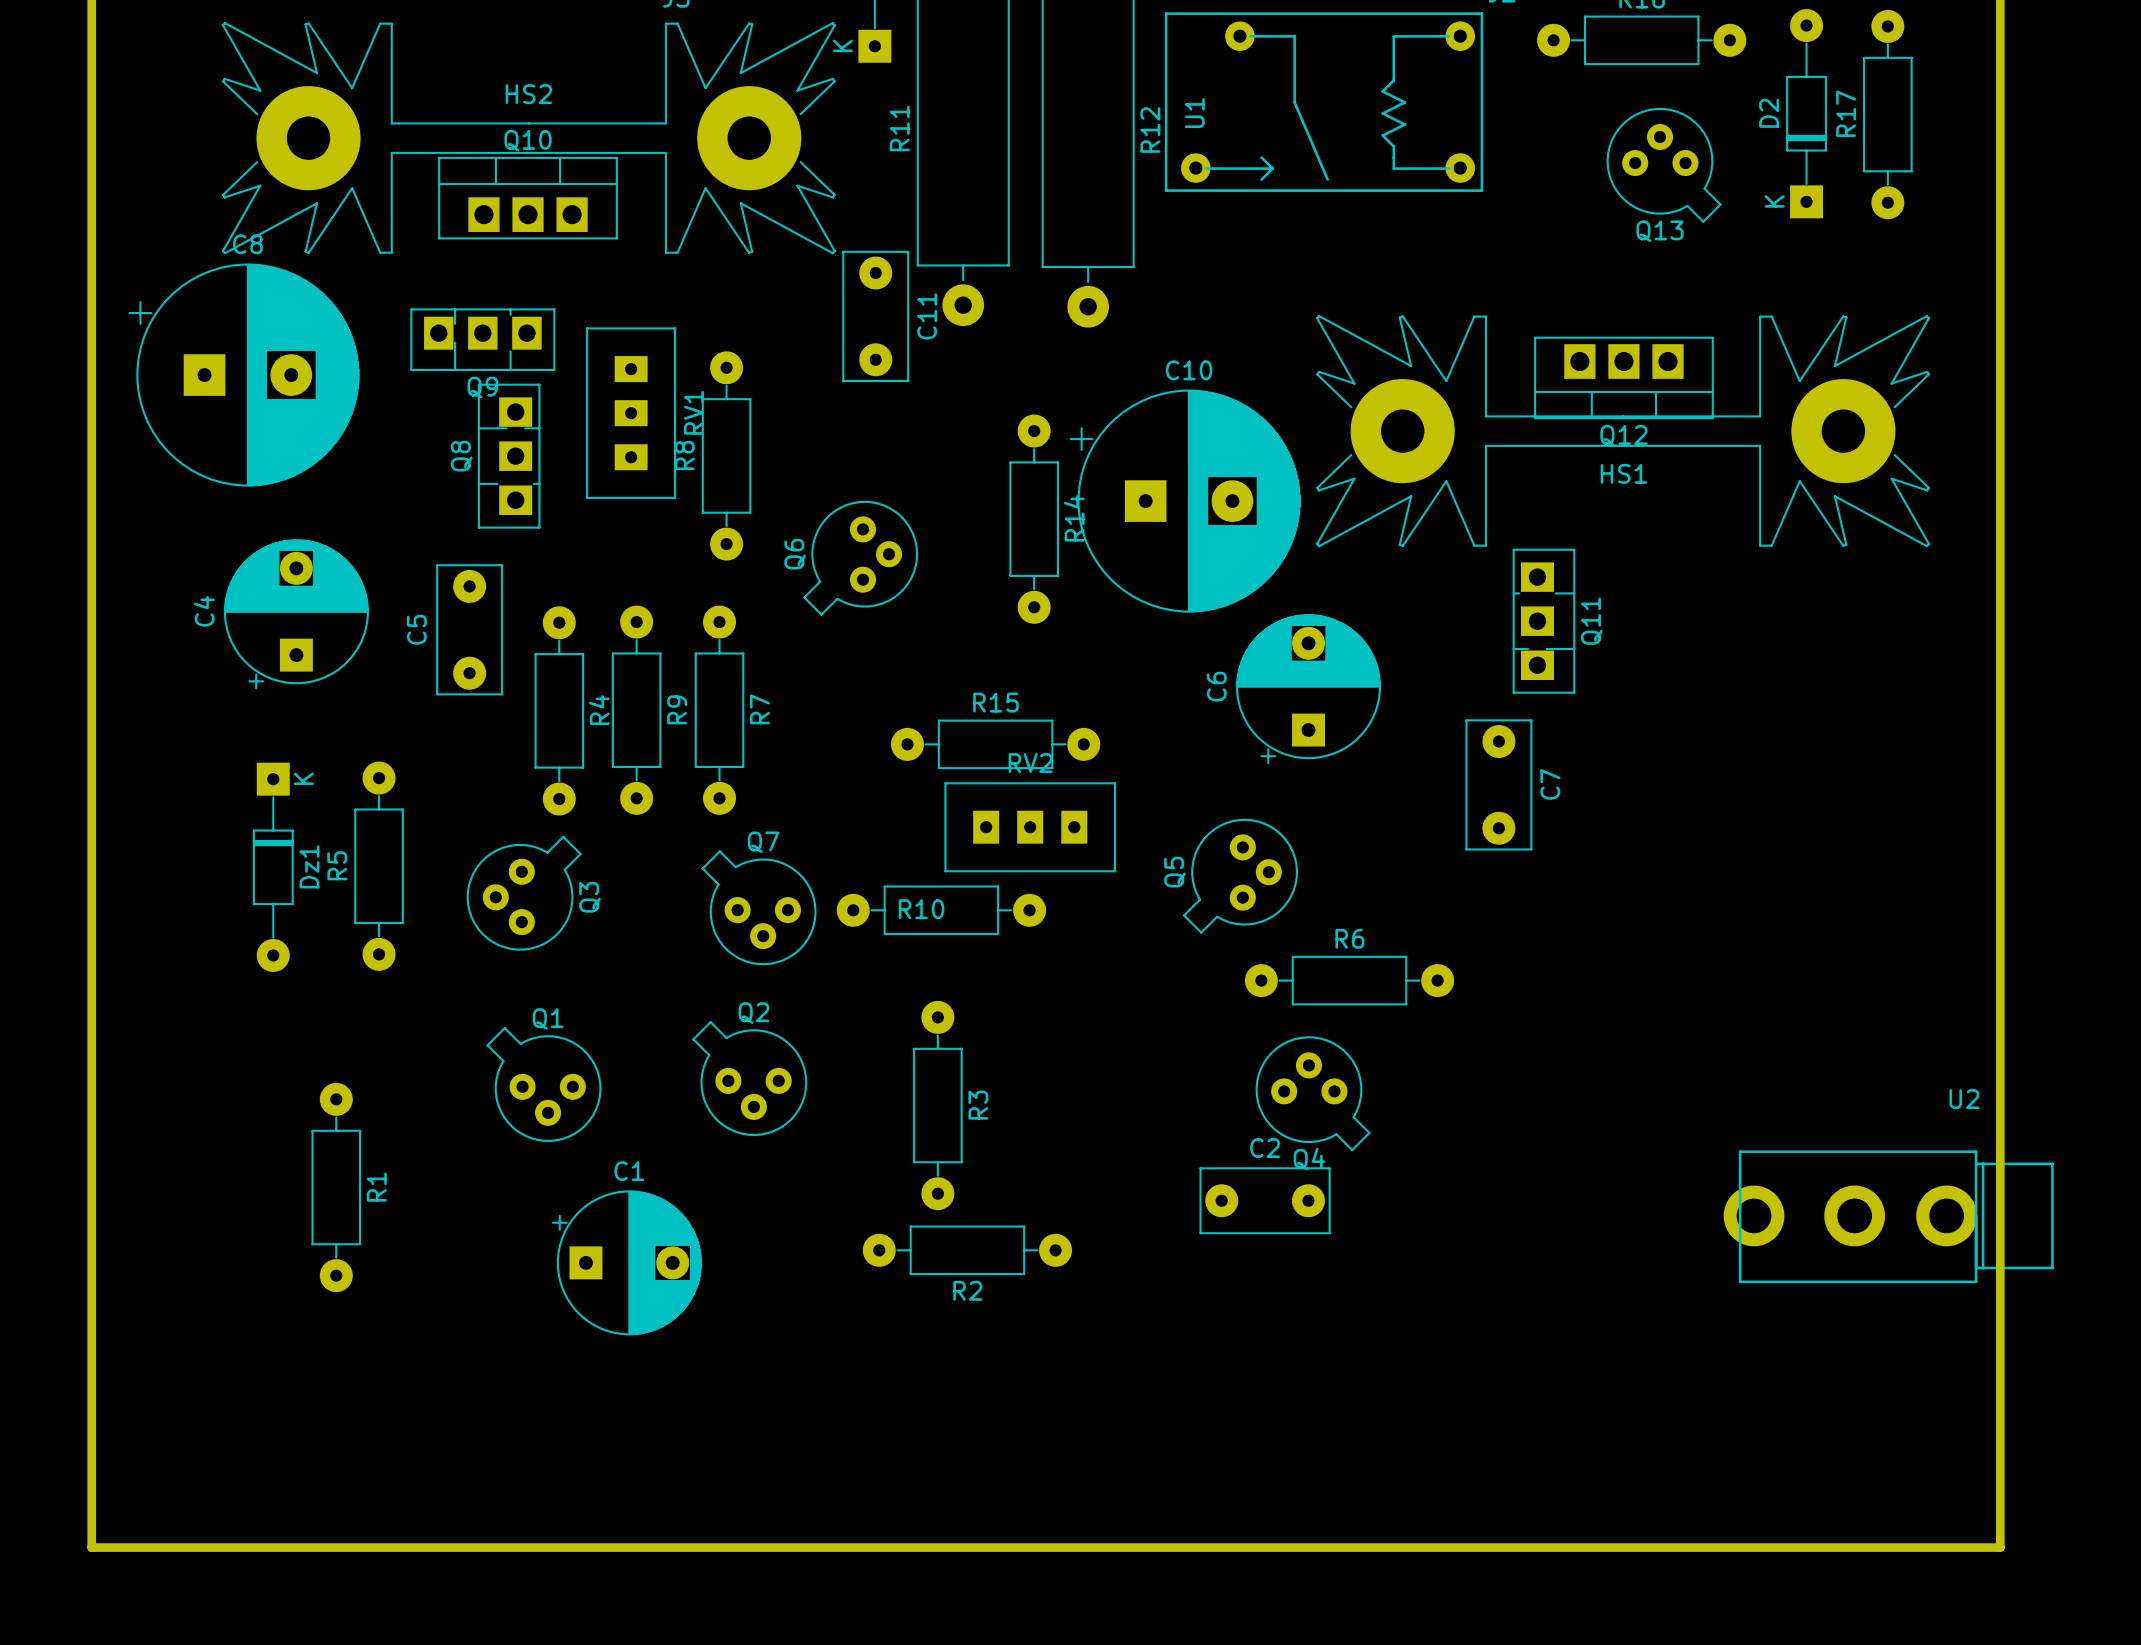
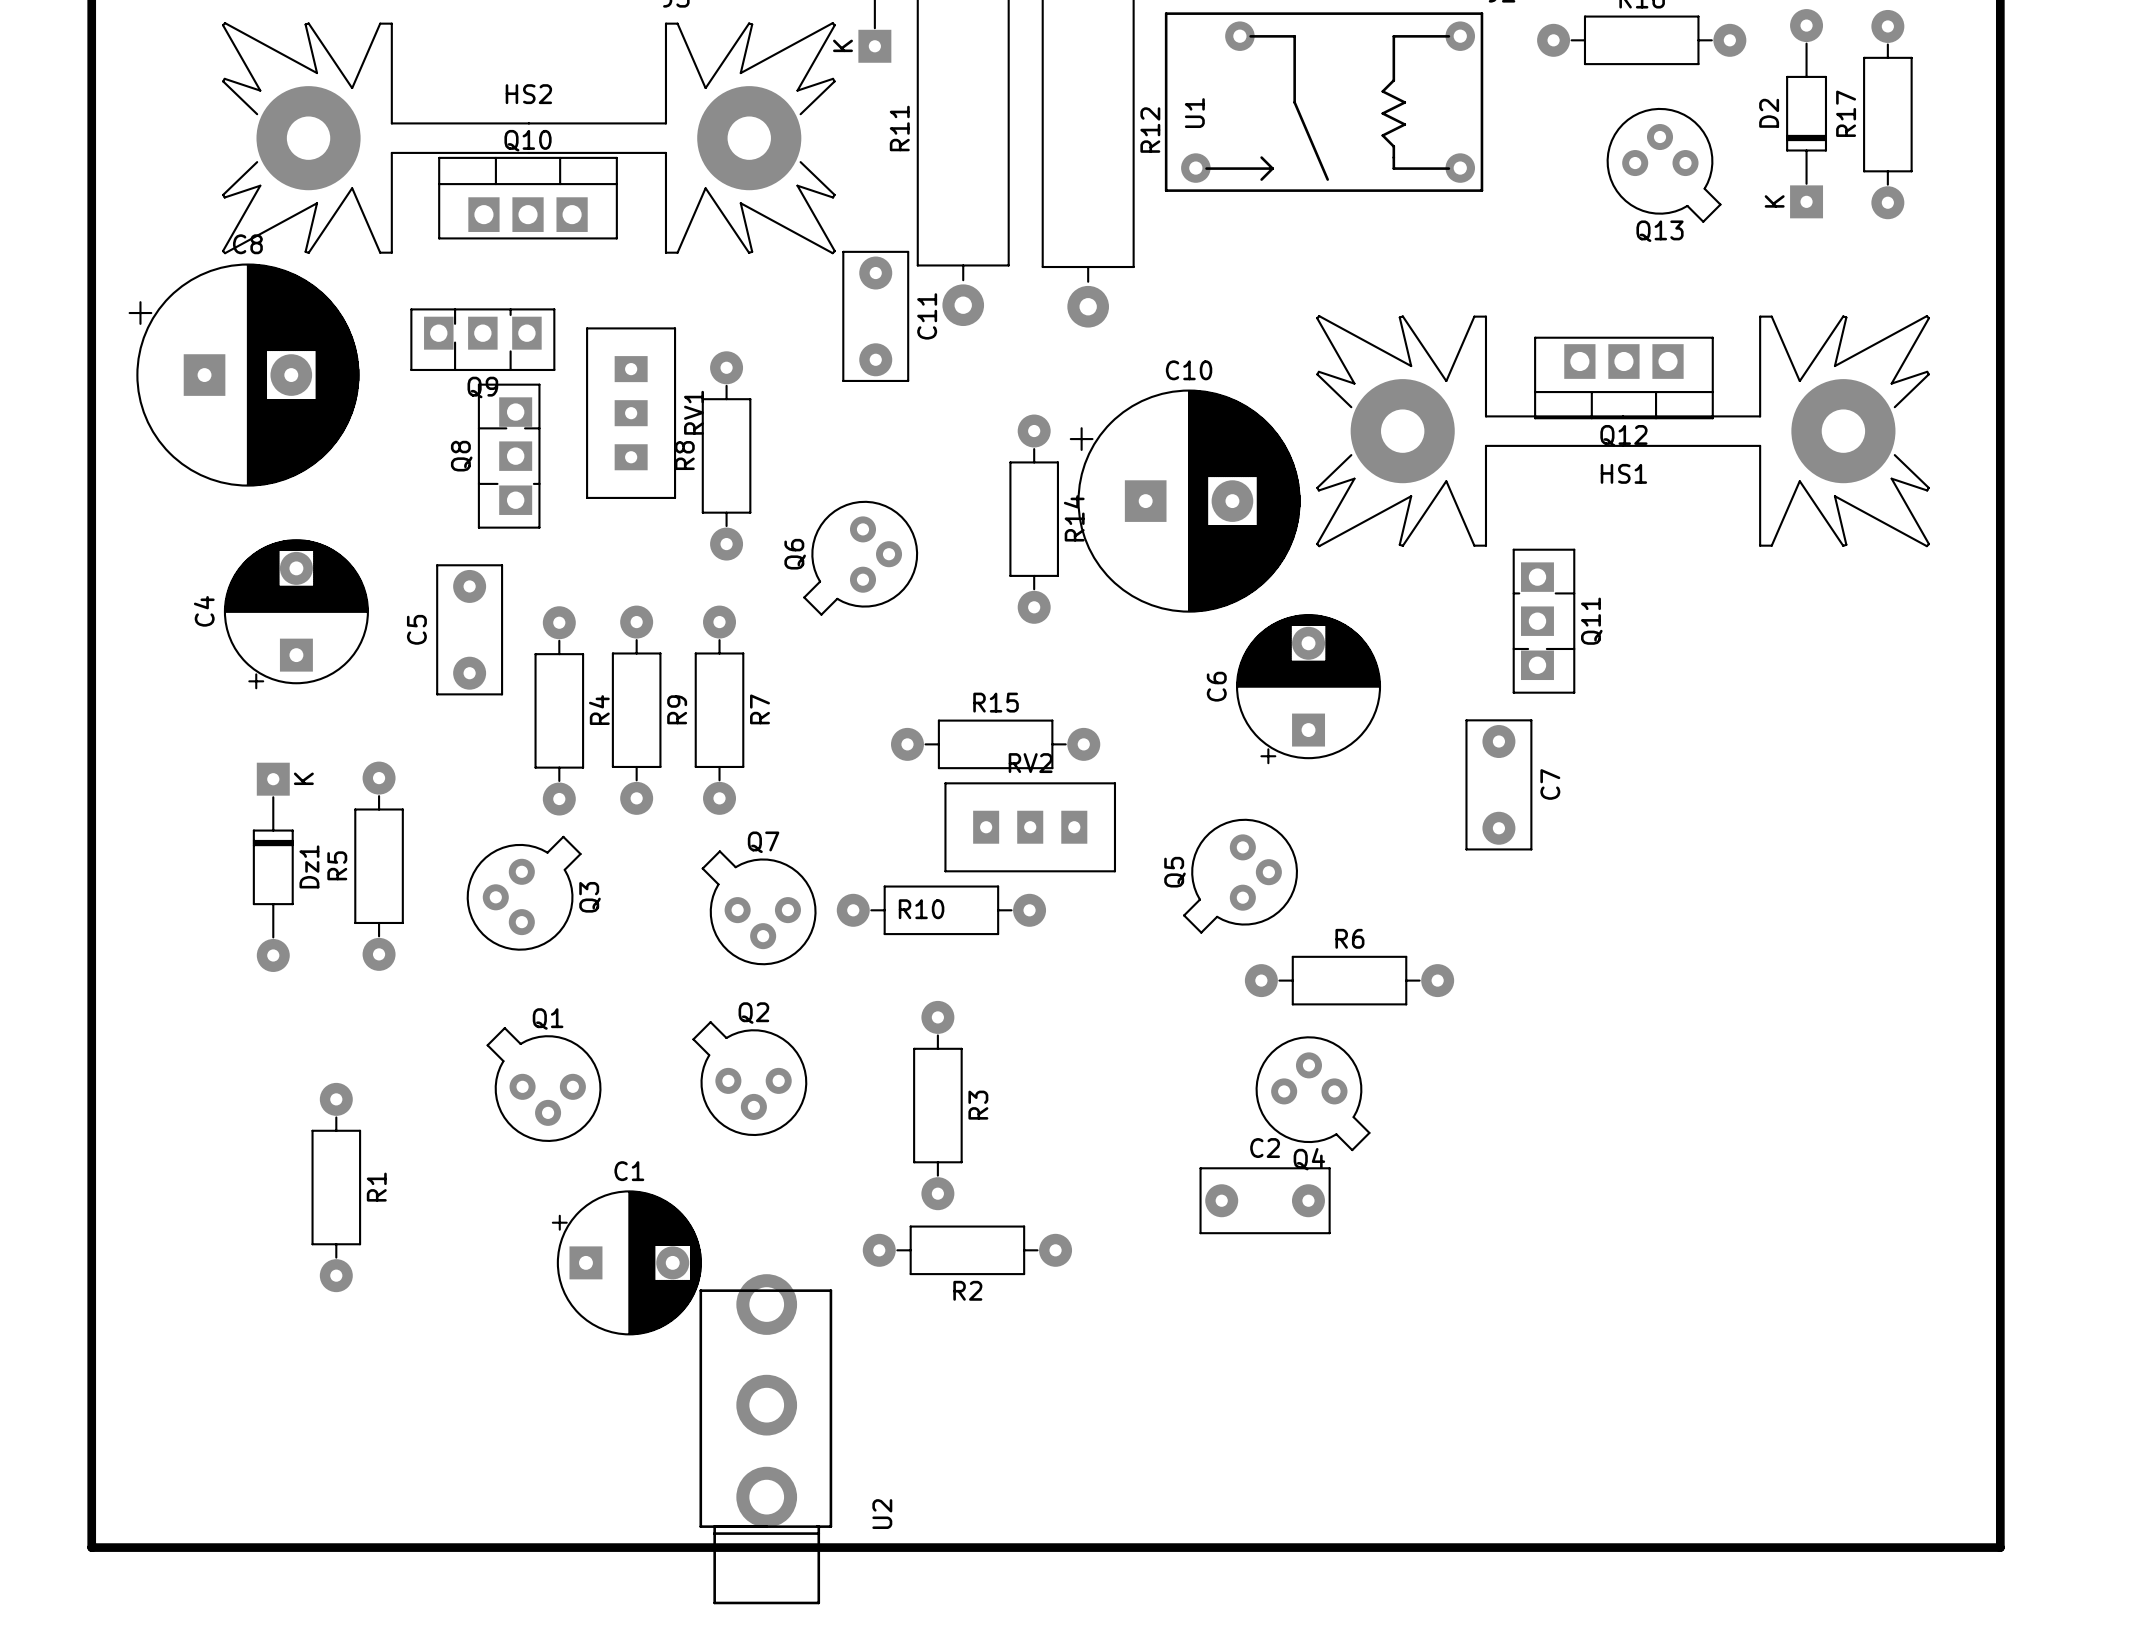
U2 rotation: 0° (1888, 1216) -> 90° clockwise (765, 1439)
U2 position: (1888, 1216) -> (765, 1439)

